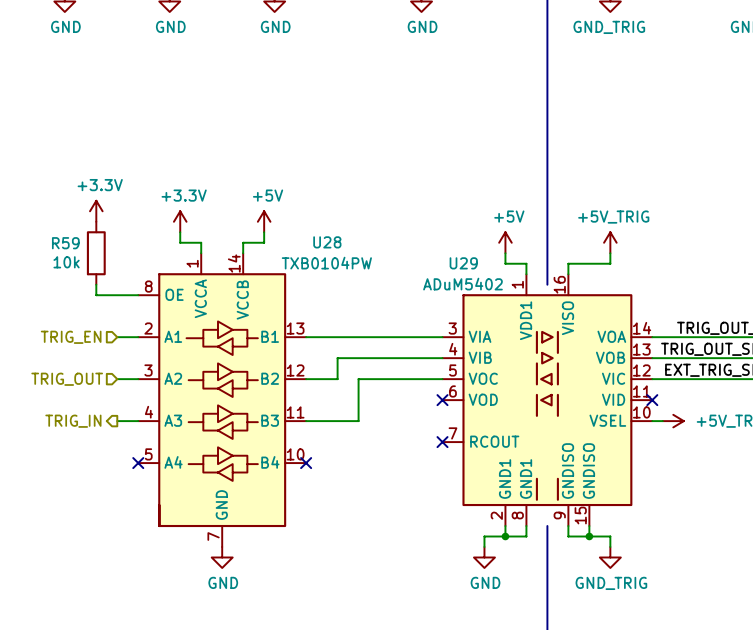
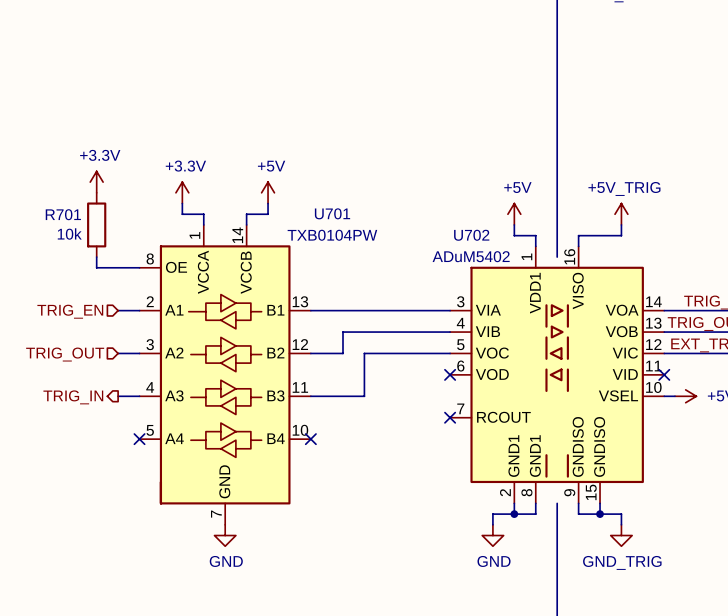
U28 name: U28 (327, 242) -> U701 (332, 213)
R59 name: R59 (65, 243) -> R701 (63, 214)
U29 name: U29 (463, 263) -> U702 (471, 235)

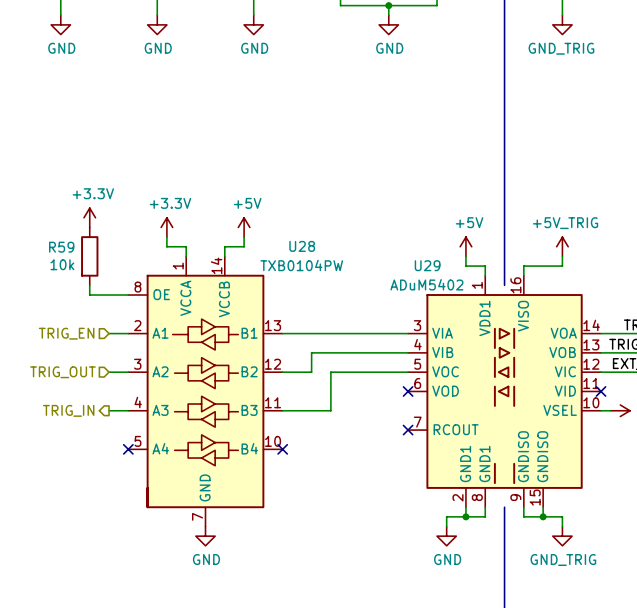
U701 name: U701 (332, 213) -> U28 (302, 246)
R701 name: R701 (63, 214) -> R59 (61, 247)
U702 name: U702 (471, 235) -> U29 (427, 265)

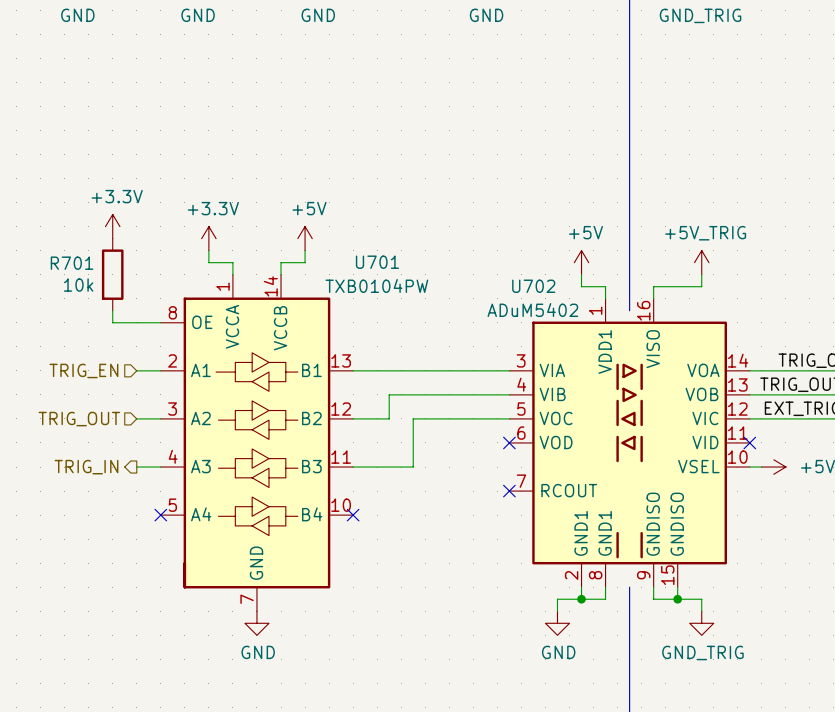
U28 name: U28 (302, 246) -> U701 (377, 262)
R59 name: R59 (61, 247) -> R701 (72, 263)
U29 name: U29 (427, 265) -> U702 (533, 286)

